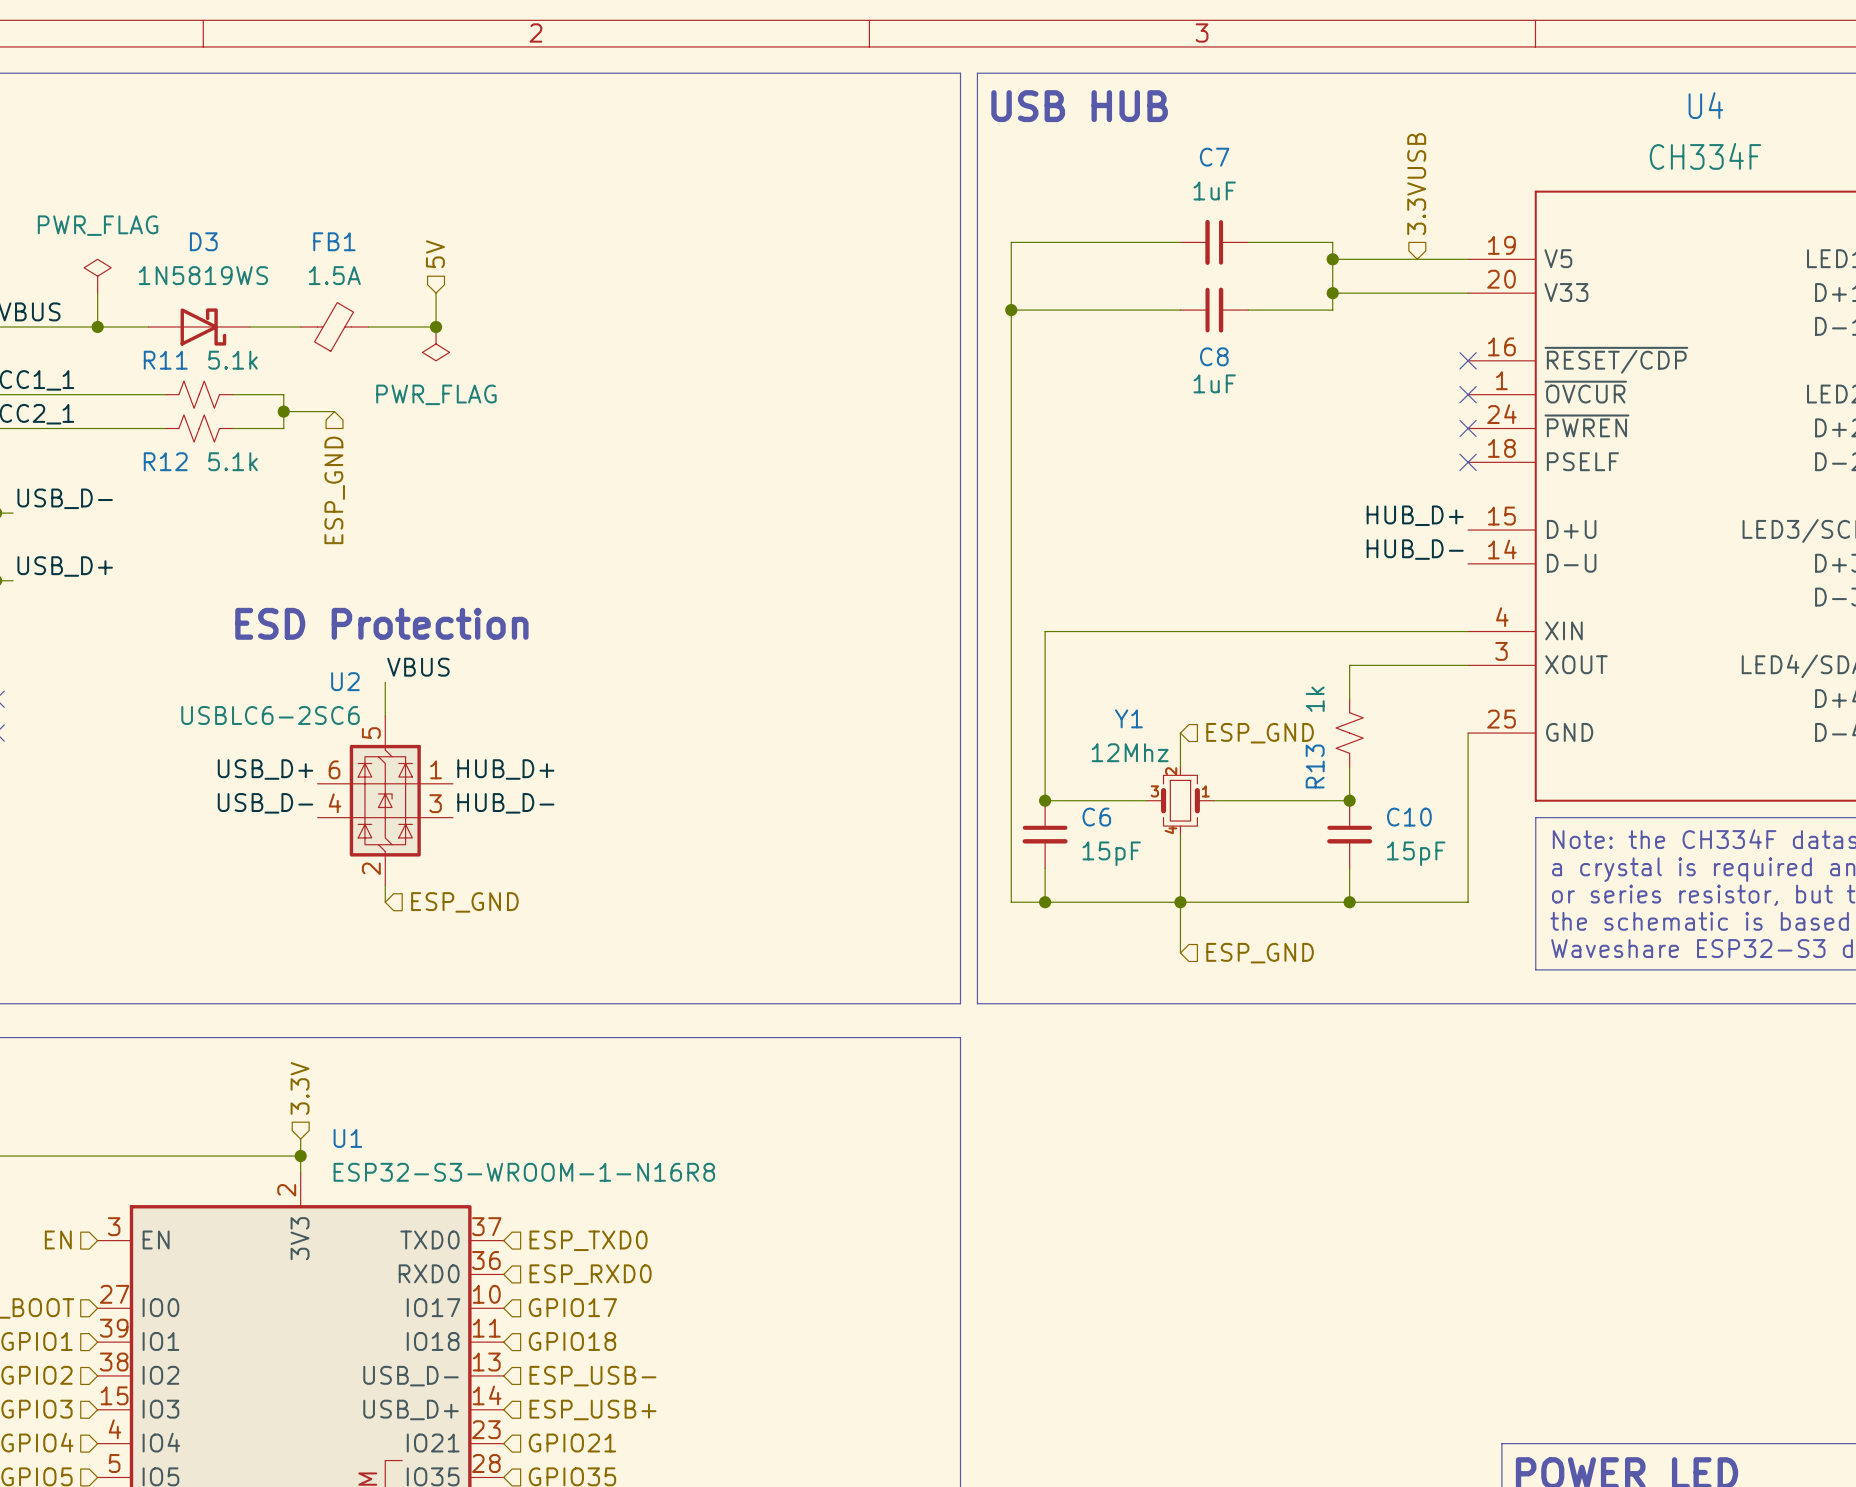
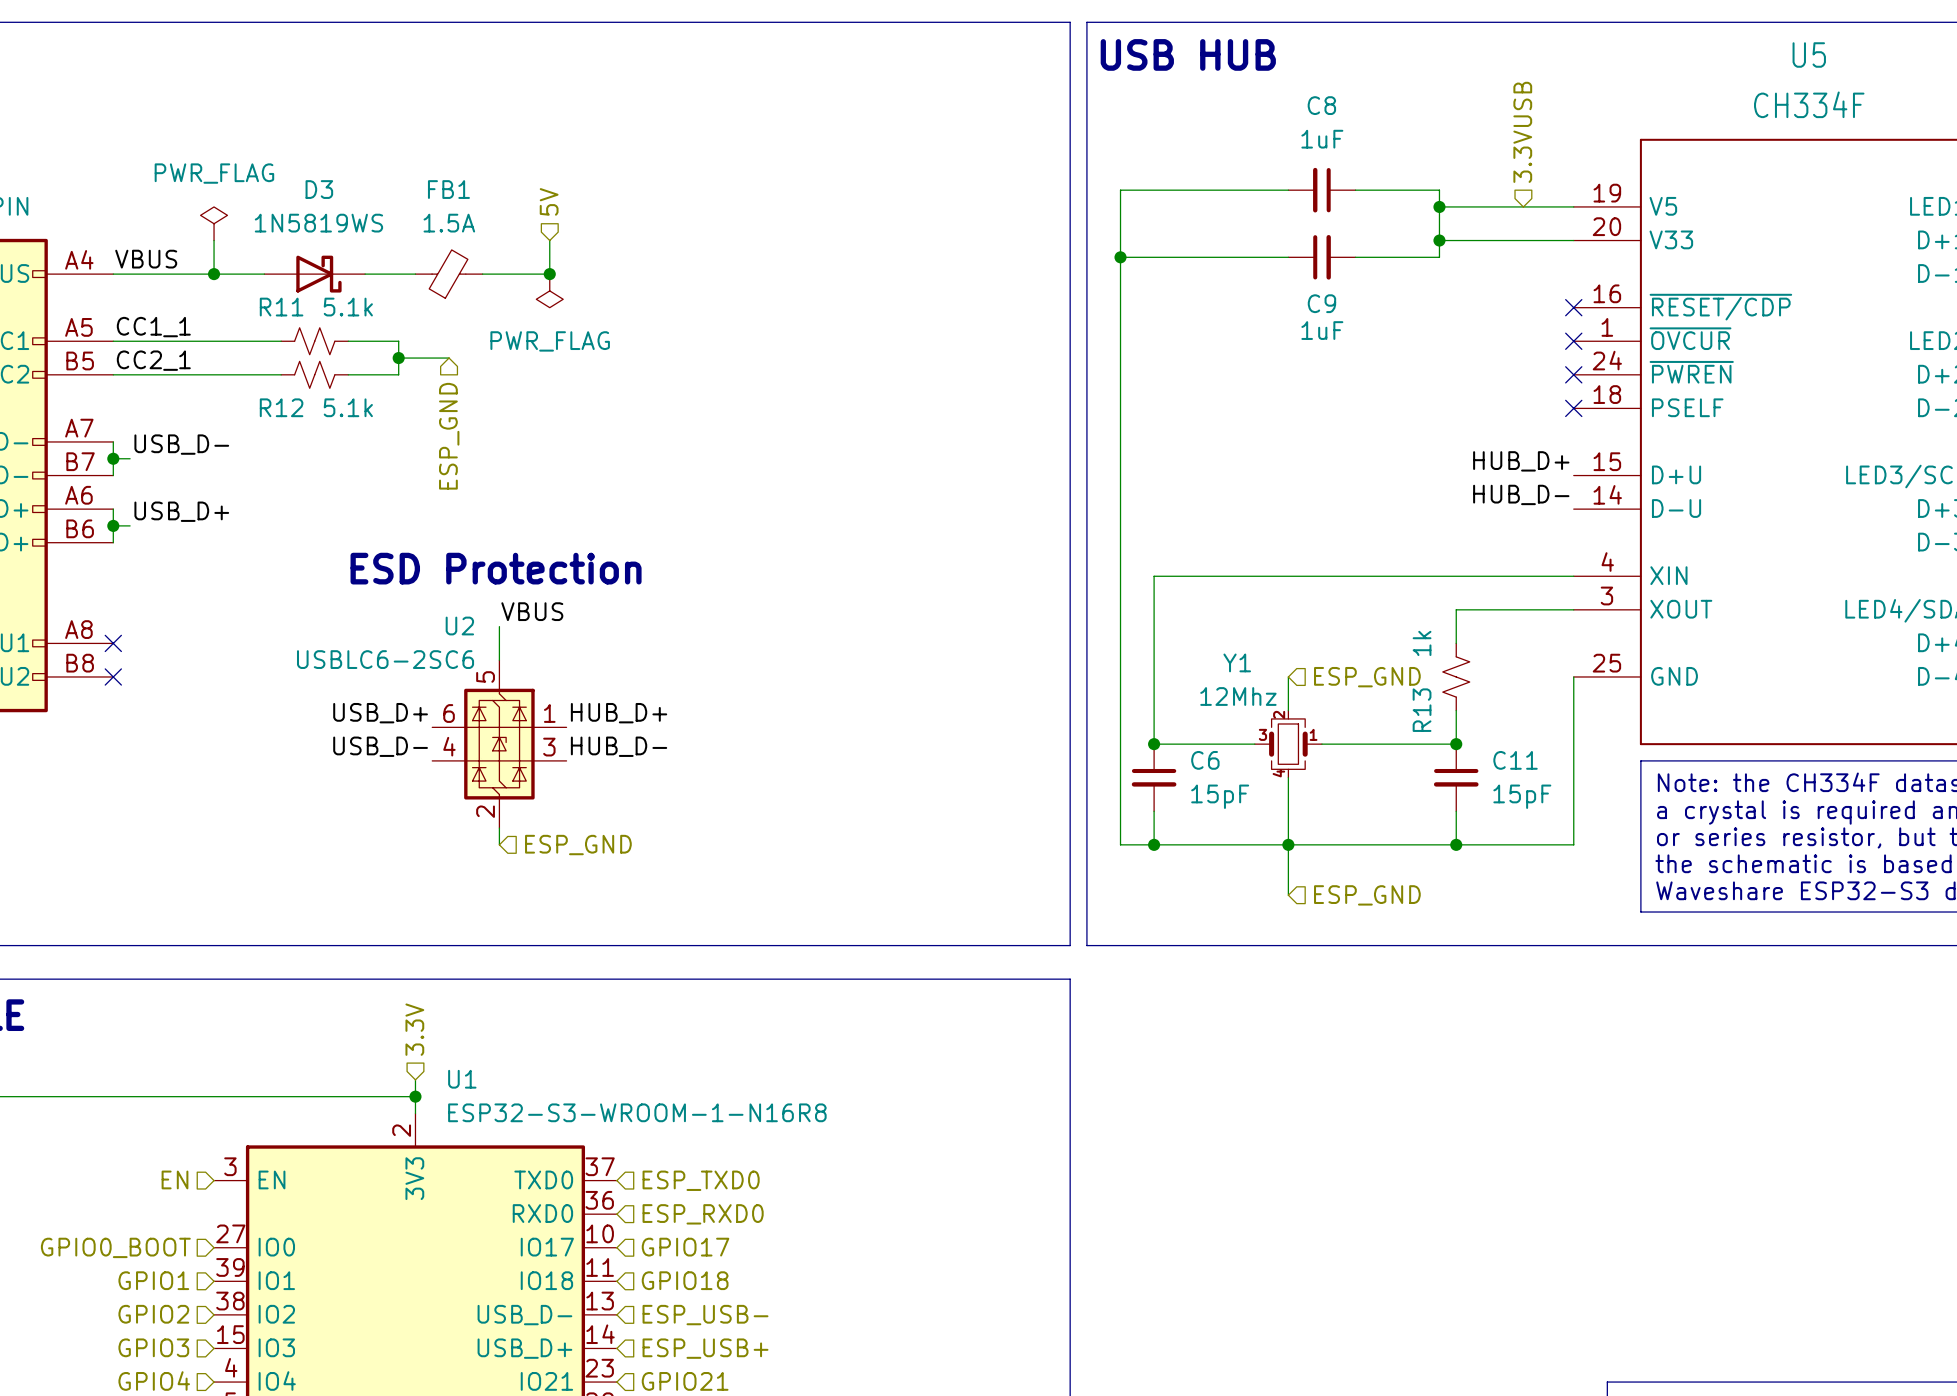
U4 name: U4 (1705, 105) -> U5 (1809, 55)
C7 name: C7 (1214, 157) -> C8 (1321, 105)
C8 name: C8 (1214, 356) -> C9 (1321, 303)
C10 name: C10 (1409, 817) -> C11 (1515, 760)

